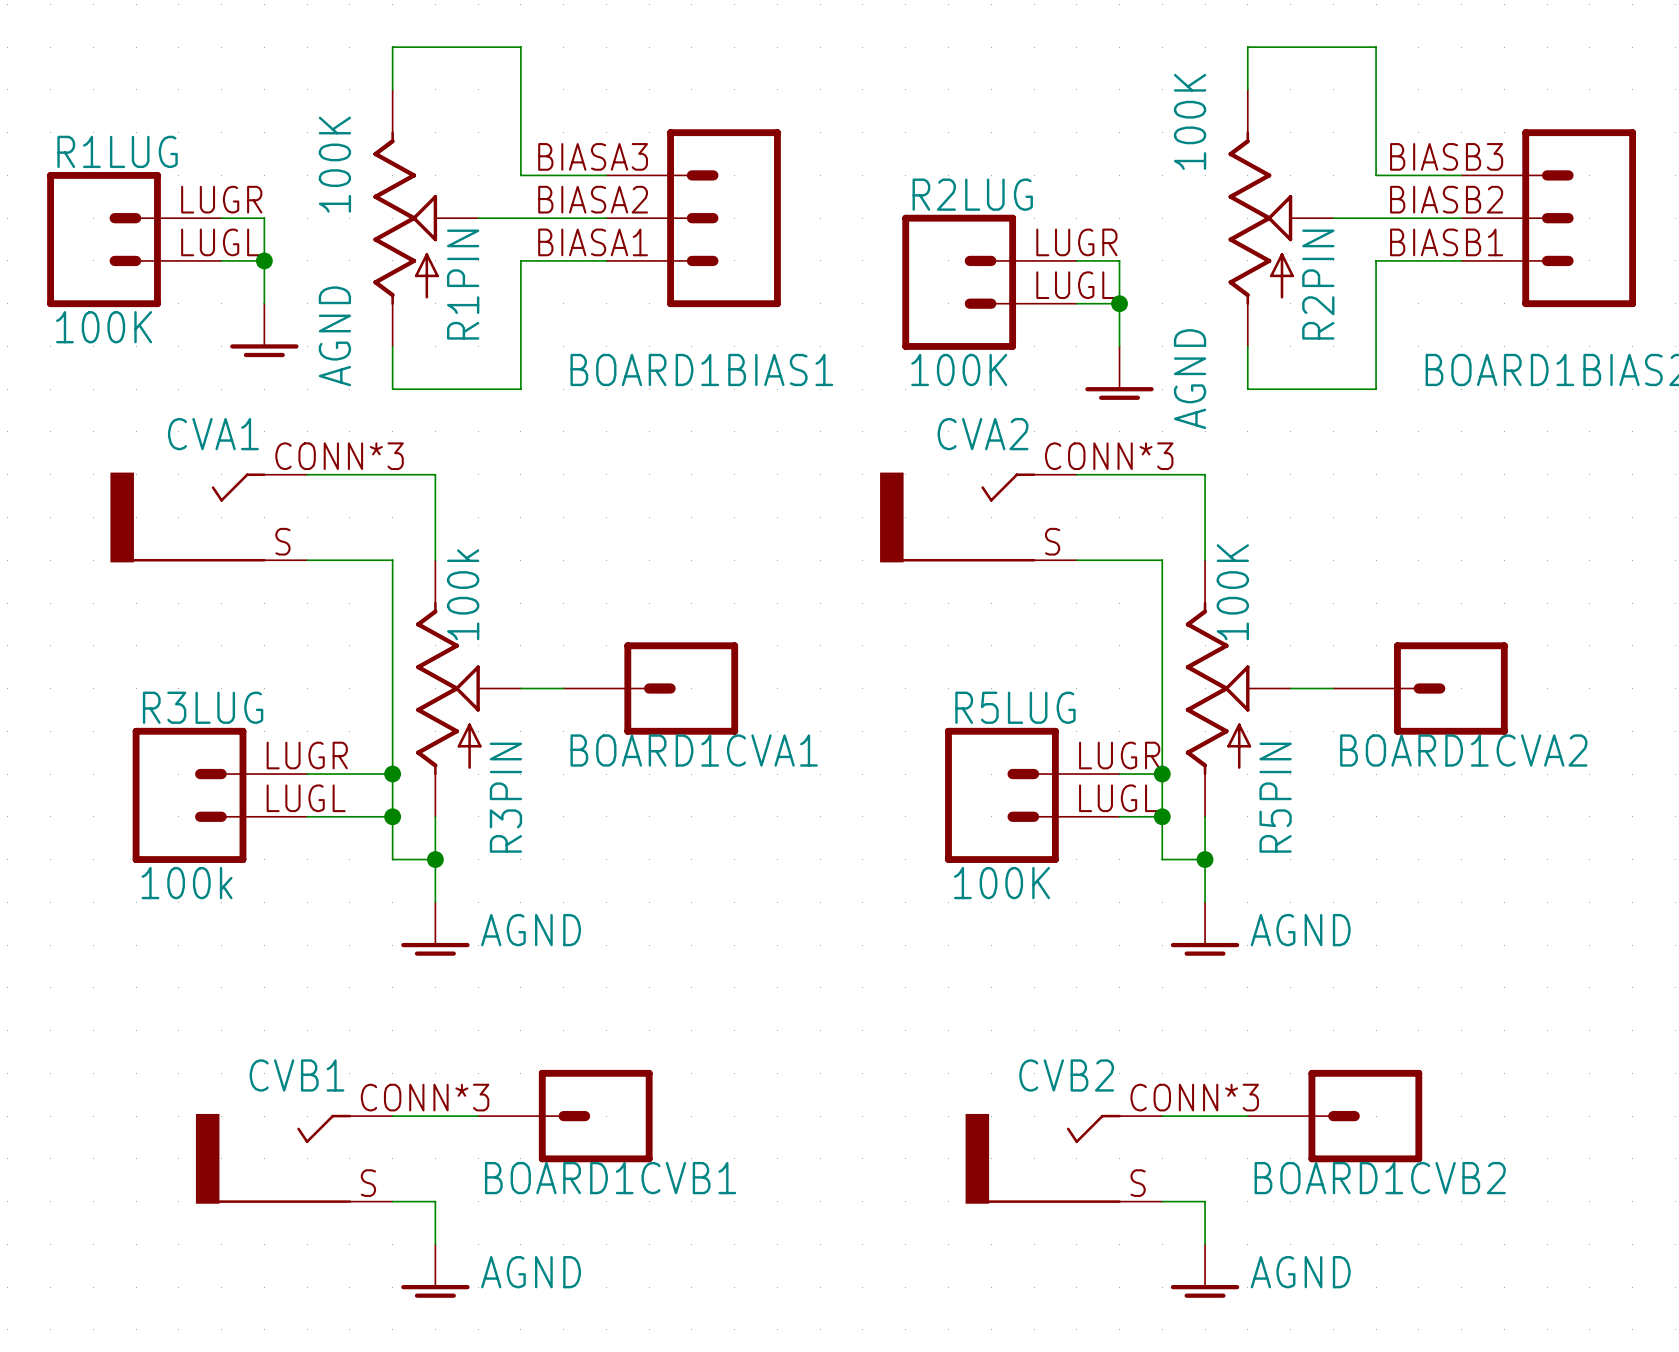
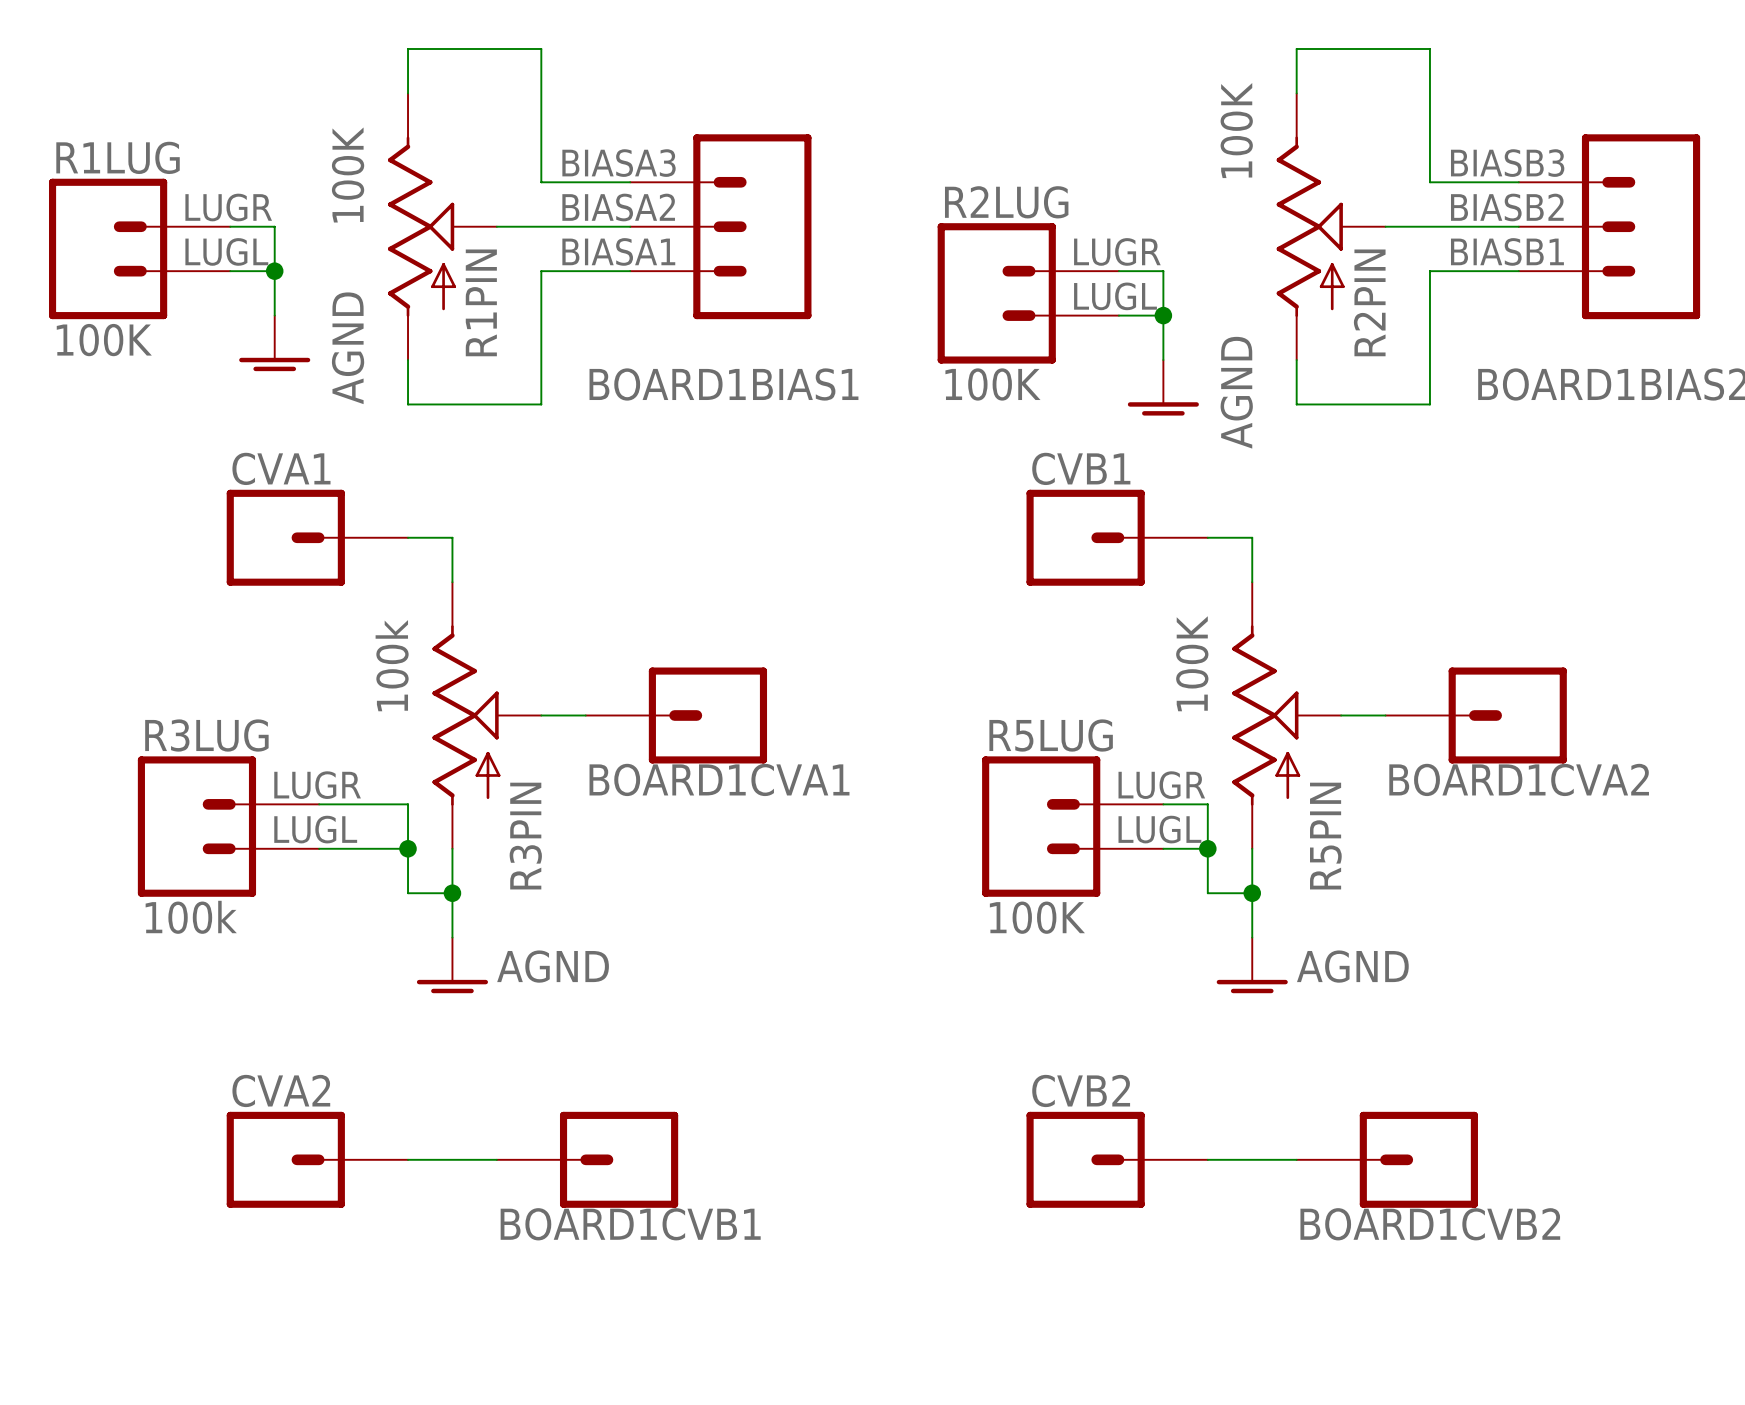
CVA1 symbol: [110, 472, 308, 563] -> [226, 489, 409, 586]
CVA2 symbol: [880, 472, 1077, 563] -> [226, 1111, 409, 1208]
wire: (307, 474) (435, 474) (435, 517) -> (408, 537) (452, 537)
wire: (1076, 474) (1205, 474) (1205, 517) -> (1207, 537) (1252, 537)
wire: (307, 560) (392, 560) (392, 774) -> none
wire: (1076, 560) (1162, 560) (1162, 774) -> none
R5PIN value position: 100K (1232, 592) -> 100K (1192, 663)
R3PIN value position: 100k (463, 594) -> 100k (392, 665)
junction: (392, 774) -> none
junction: (1162, 774) -> none
CVB1 symbol: [195, 1113, 393, 1204] -> [1026, 489, 1208, 586]
CVB2 symbol: [965, 1113, 1163, 1204] -> [1026, 1111, 1208, 1208]
wire: (392, 1201) (435, 1201) (435, 1244) -> none
wire: (1162, 1201) (1205, 1201) (1205, 1244) -> none
power symbol: AGND (435, 1271) -> none
power symbol: AGND (1205, 1271) -> none

